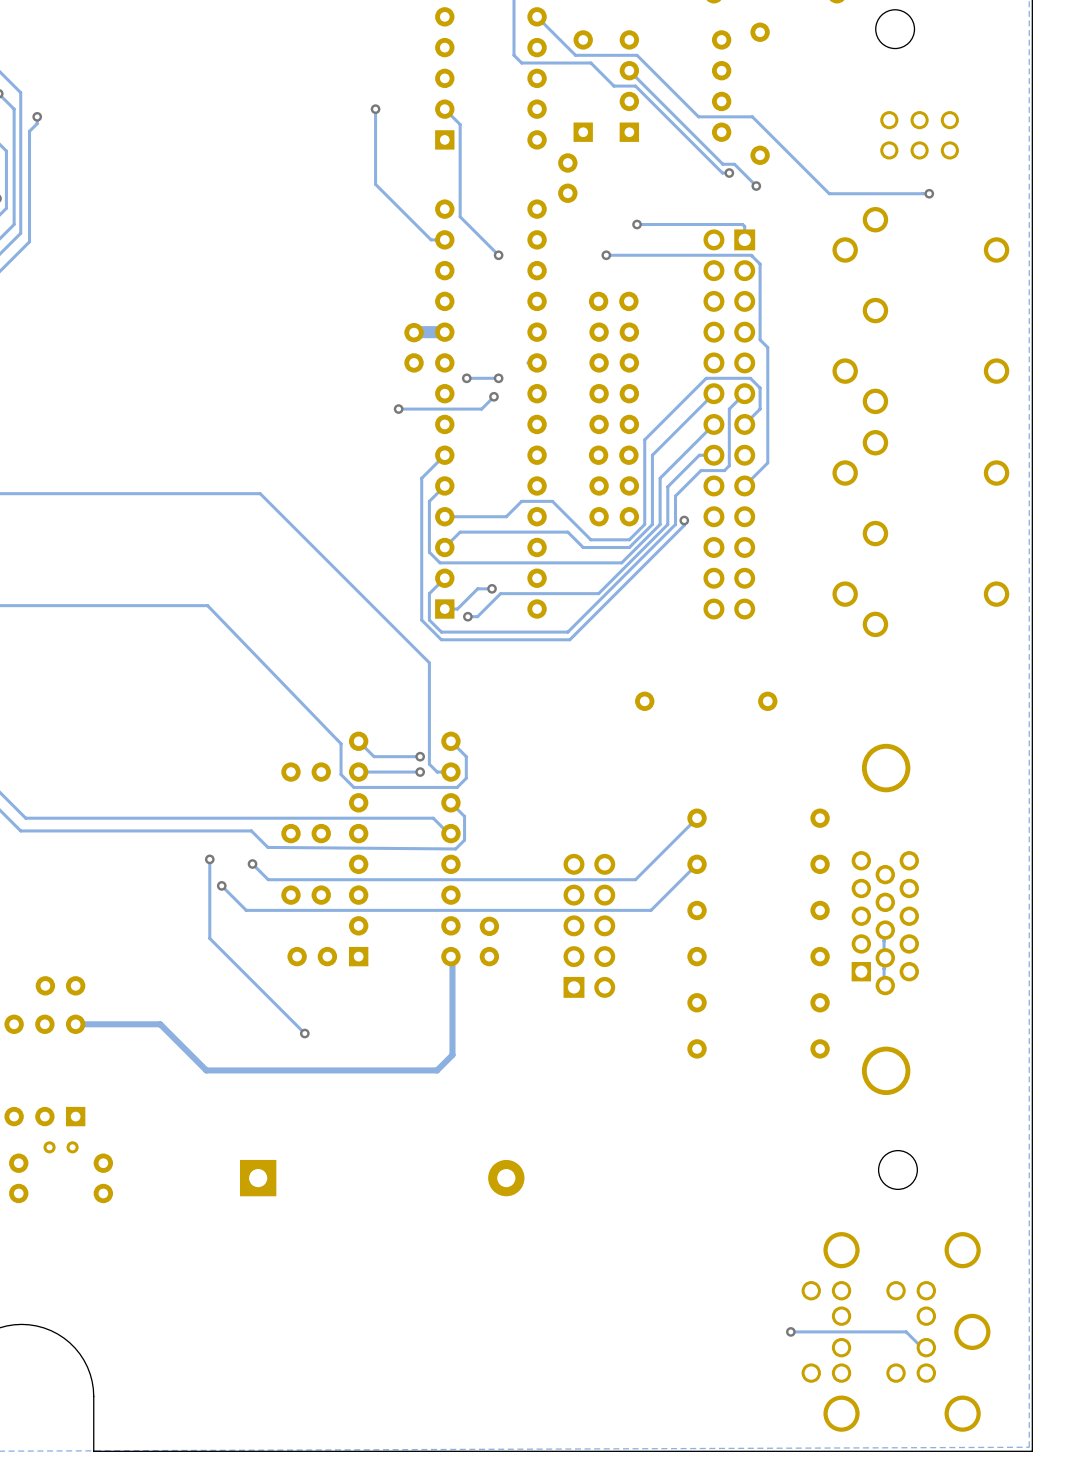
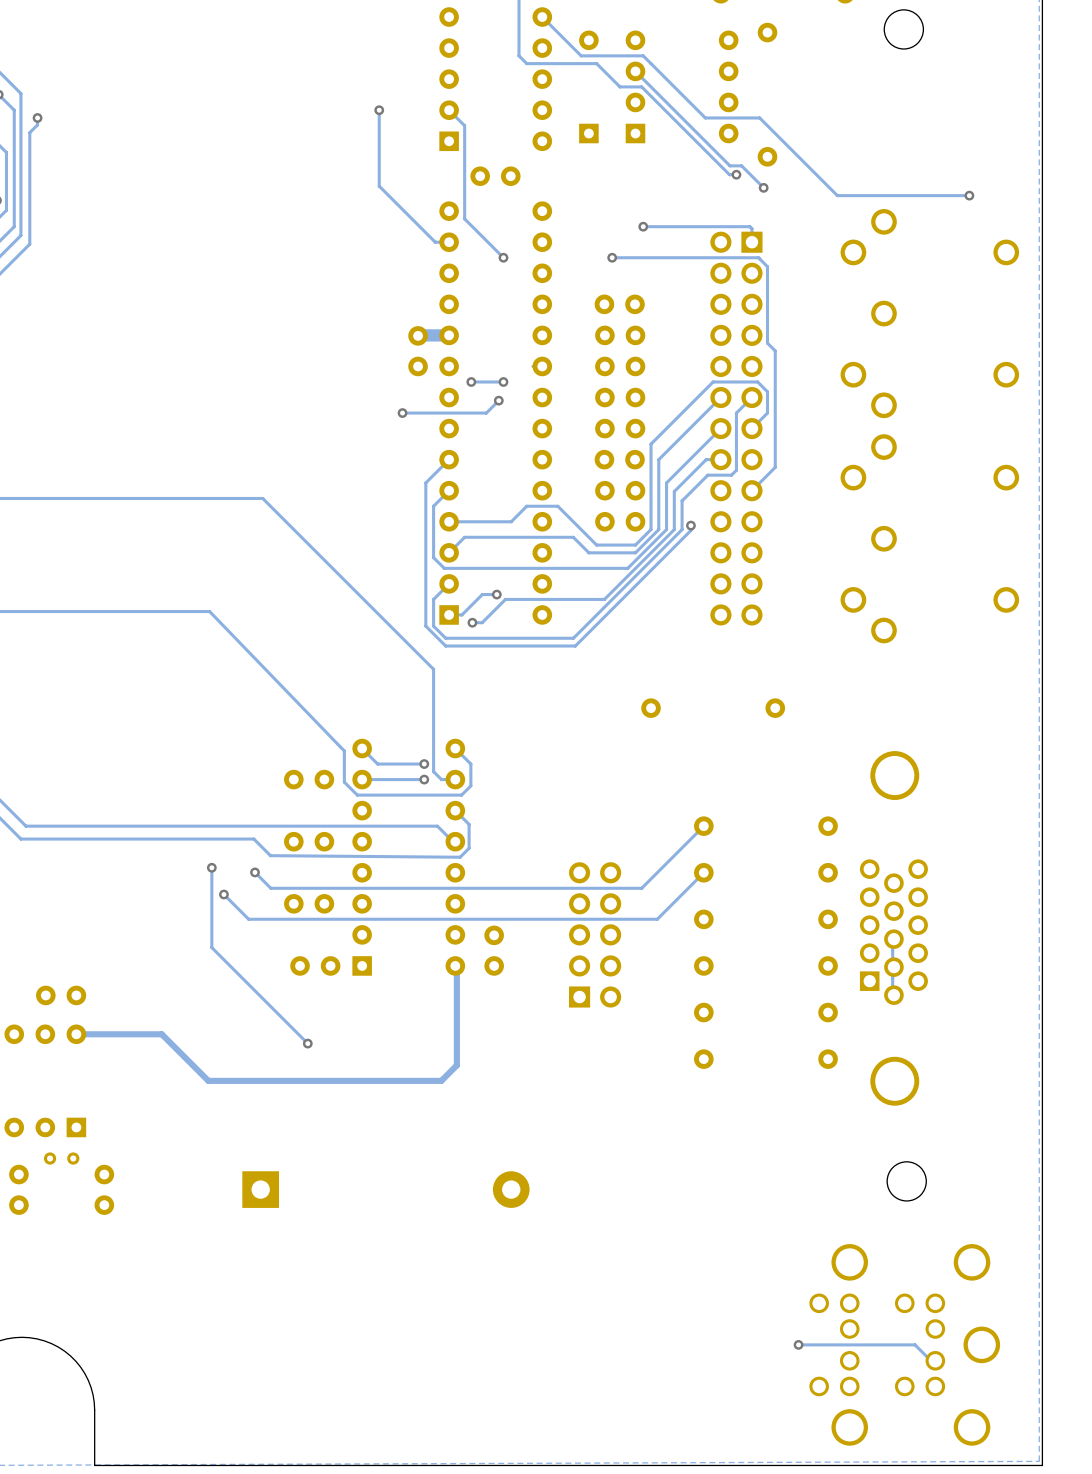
part: (919, 135) -> none
part rotation: 0° (567, 178) -> 90° clockwise (495, 176)
part position: (567, 178) -> (495, 176)
via position: (929, 193) -> (969, 195)
track: none -> (969, 195) (938, 195)

